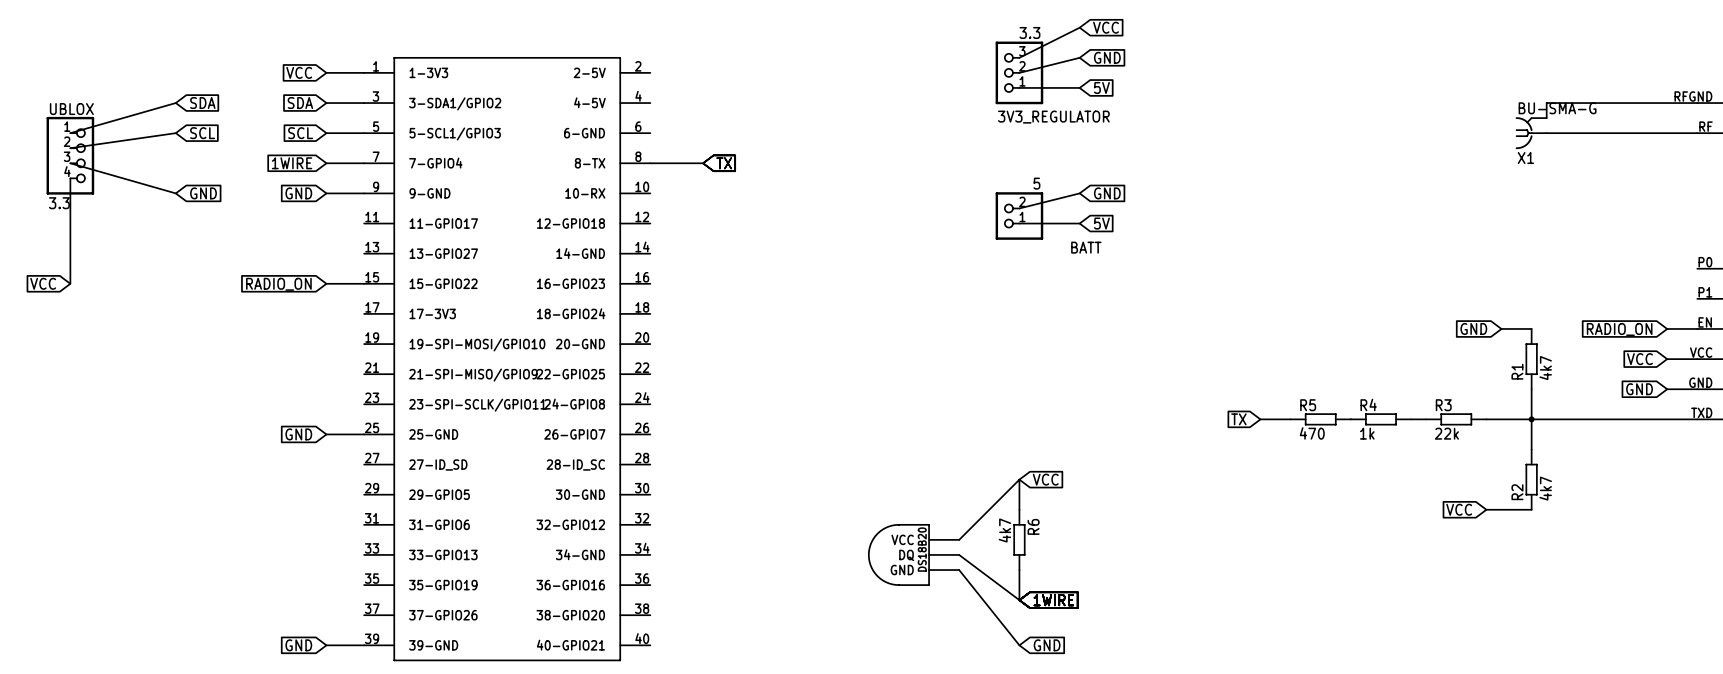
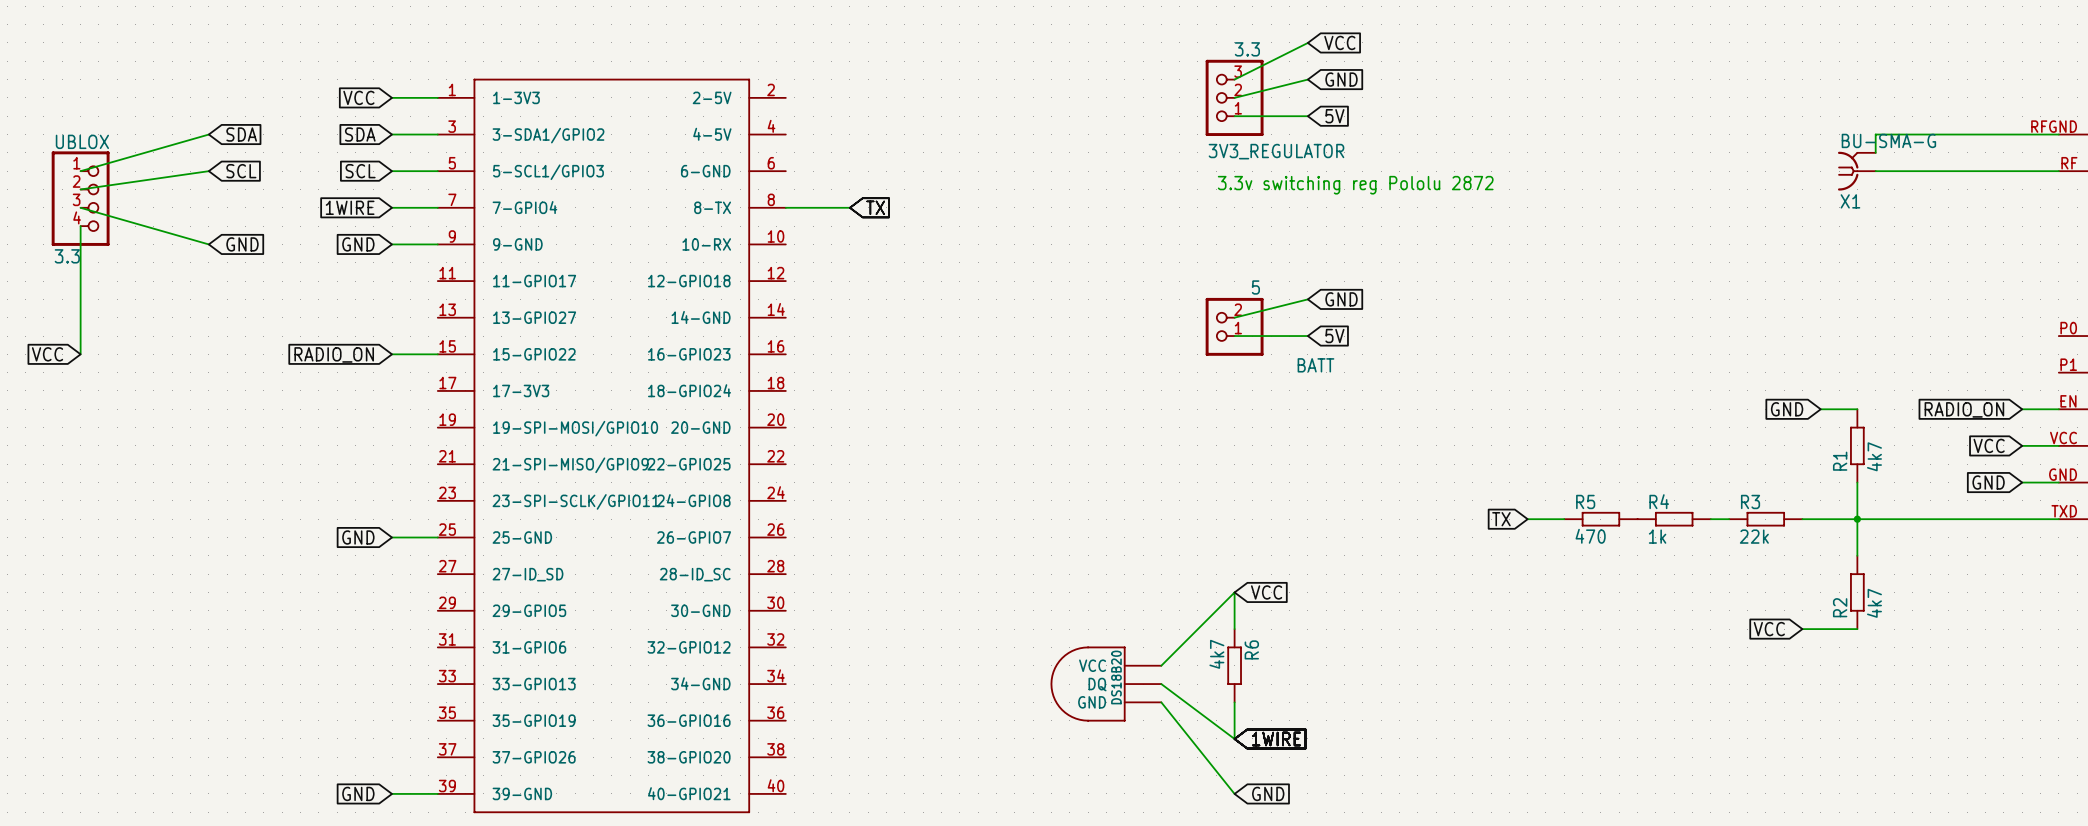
text: none -> 3.3v switching reg Pololu 2872 (1355, 185)
wire: (1079, 193) (1019, 208) -> (1307, 299) (1234, 317)
global label position: GND (1107, 193) -> GND (1341, 299)
BATT position: (1019, 216) -> (1234, 326)
wire: (1019, 223) (1079, 223) -> (1234, 336) (1307, 336)
global label position: 5V (1101, 223) -> 5V (1334, 336)

